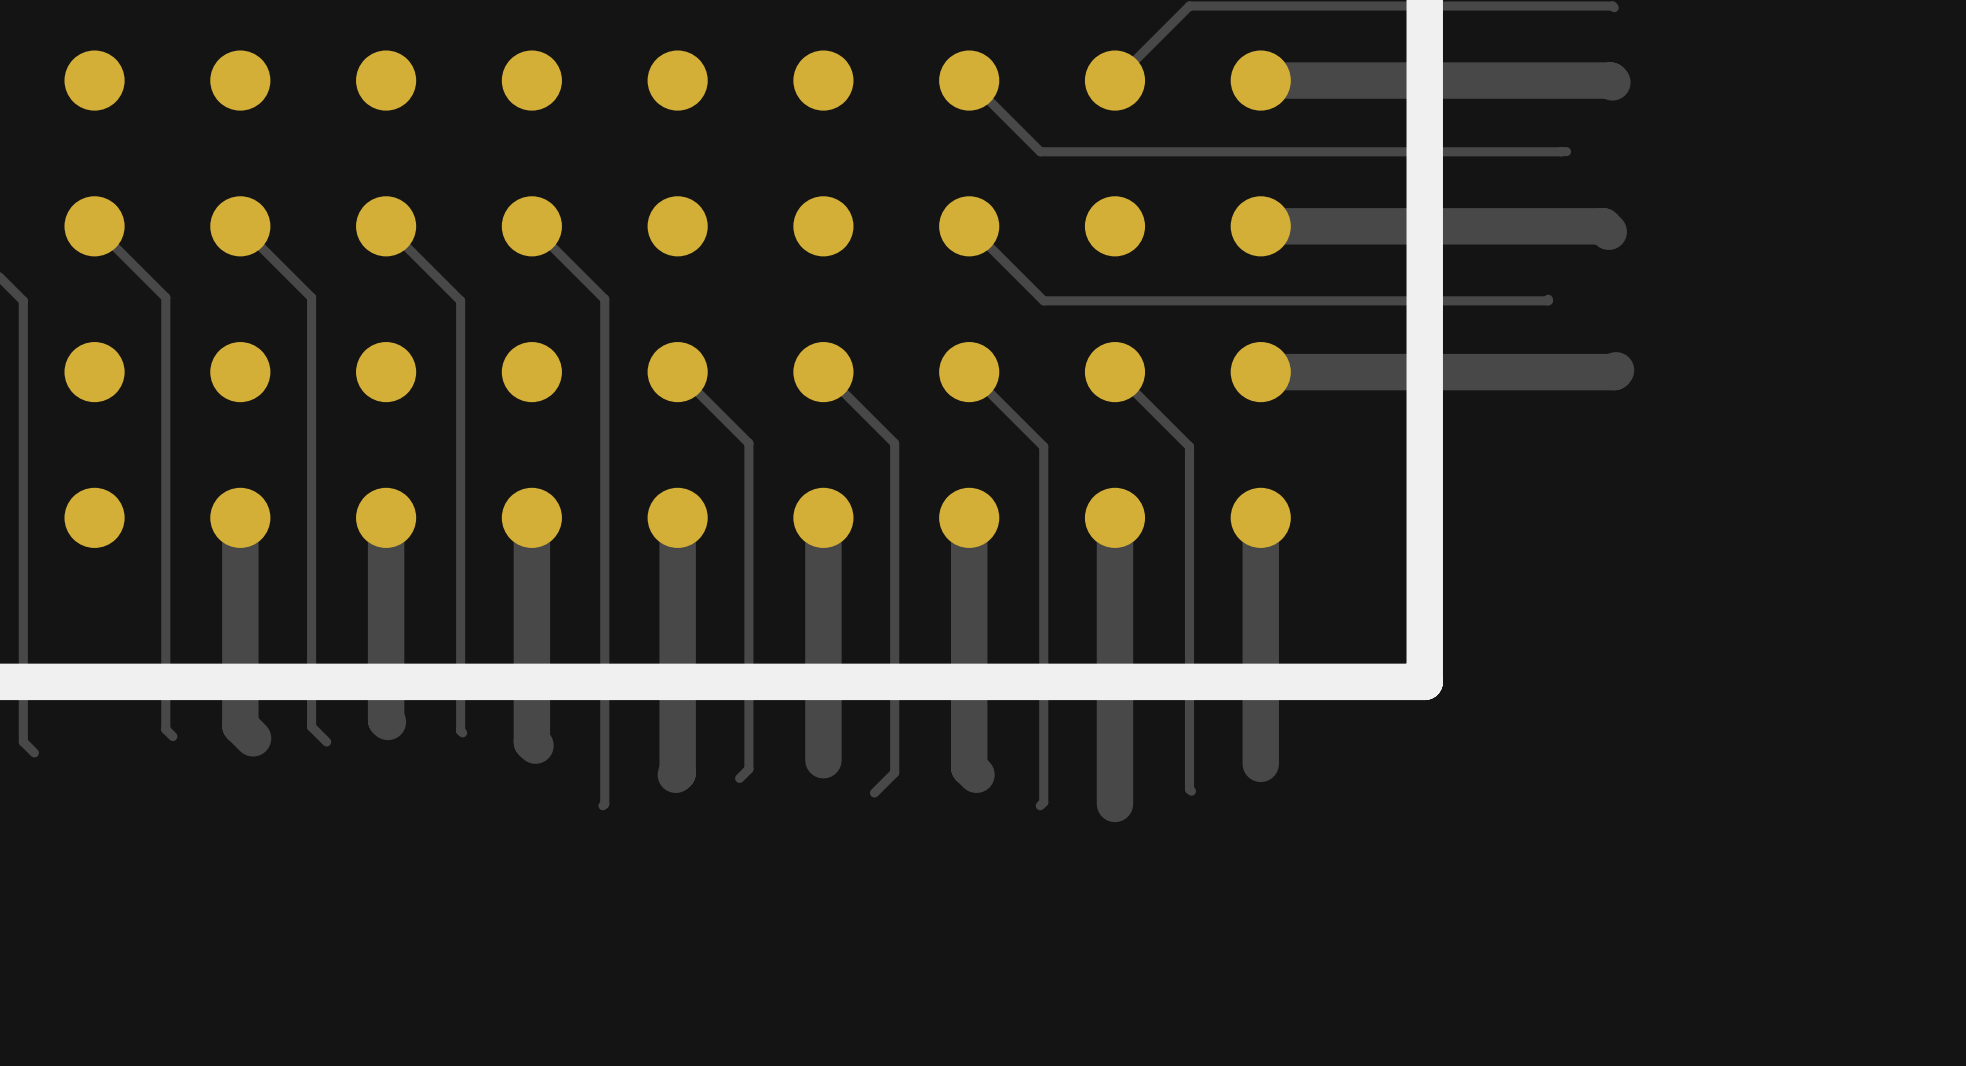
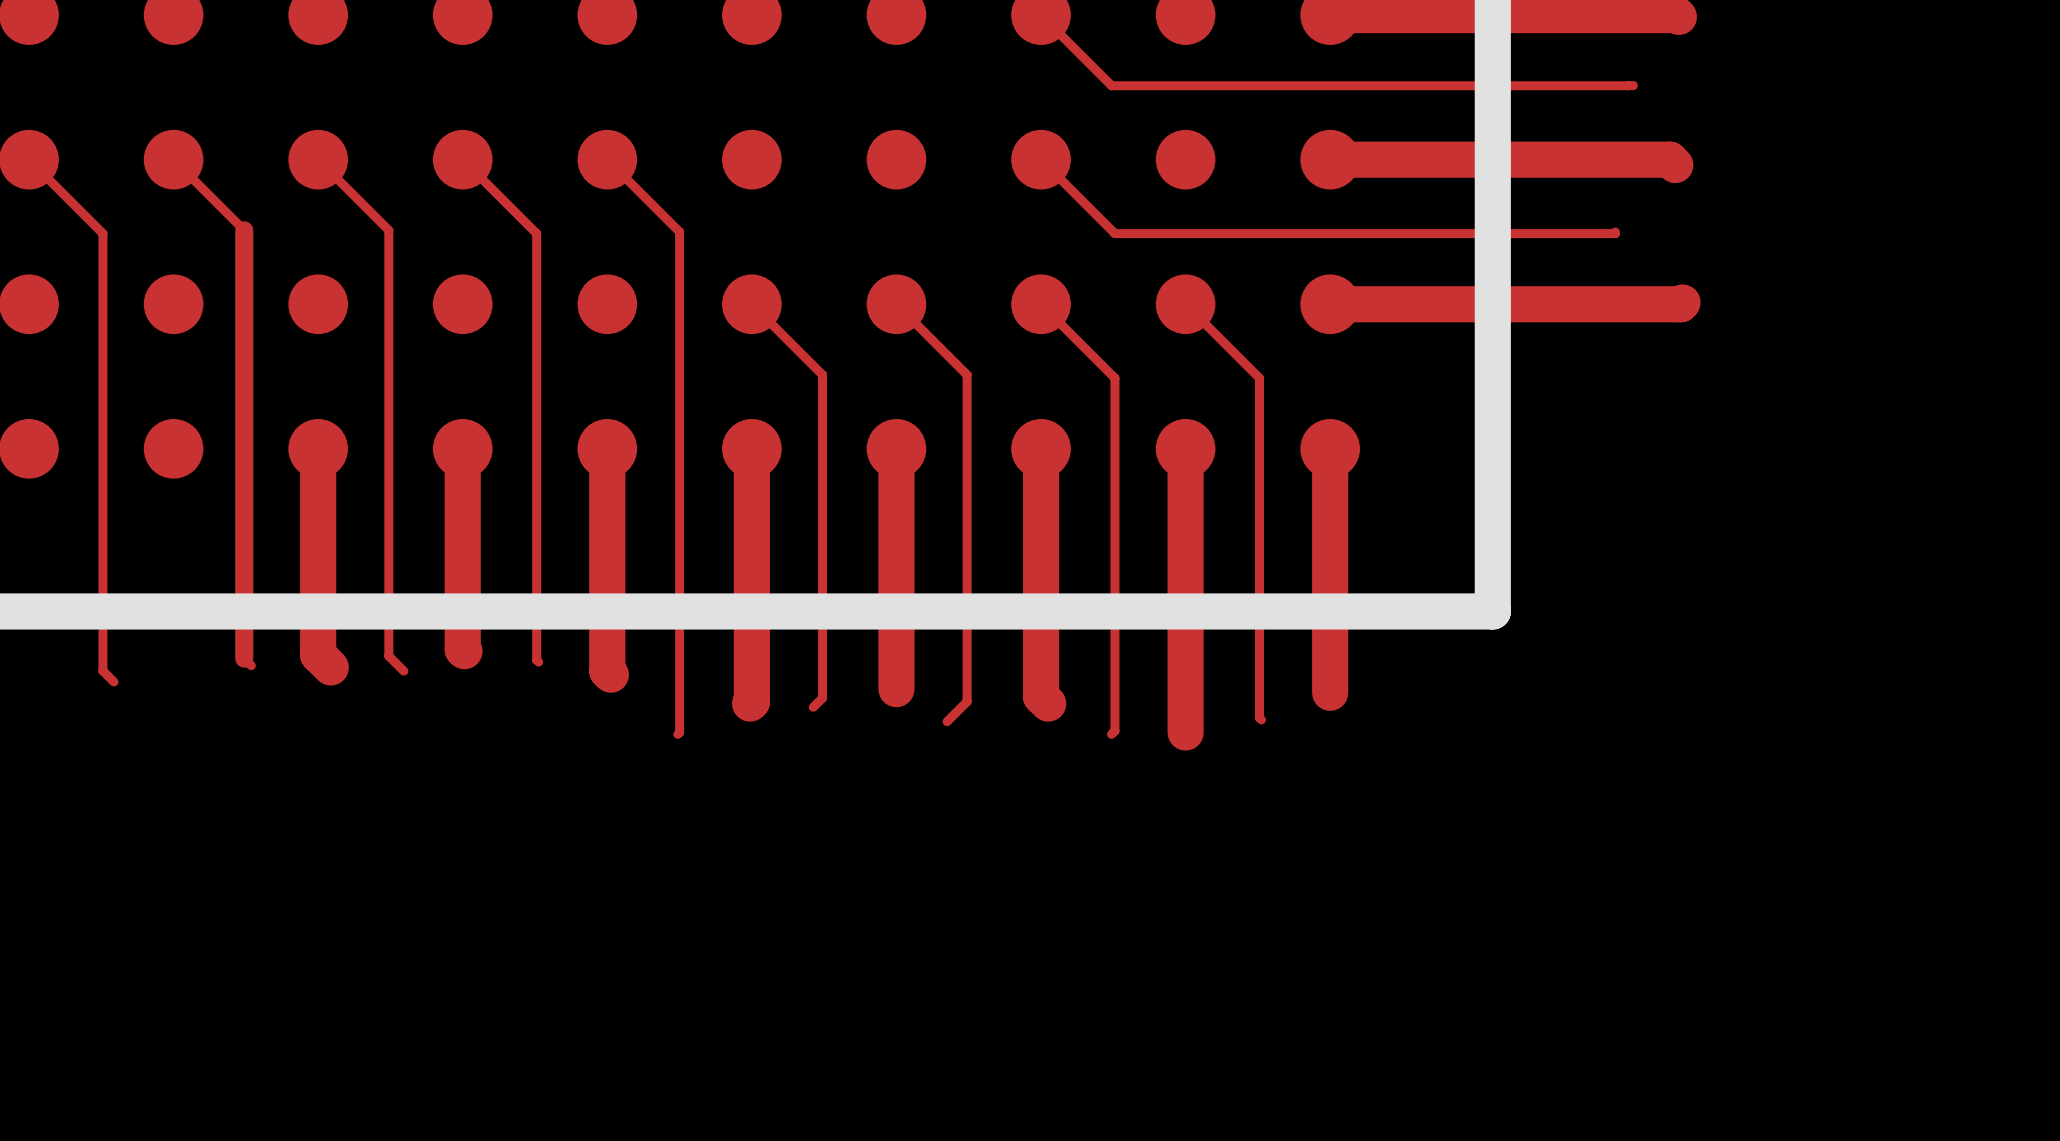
track width: thin (165, 297) (165, 729) -> thick (244, 230) (244, 658)

